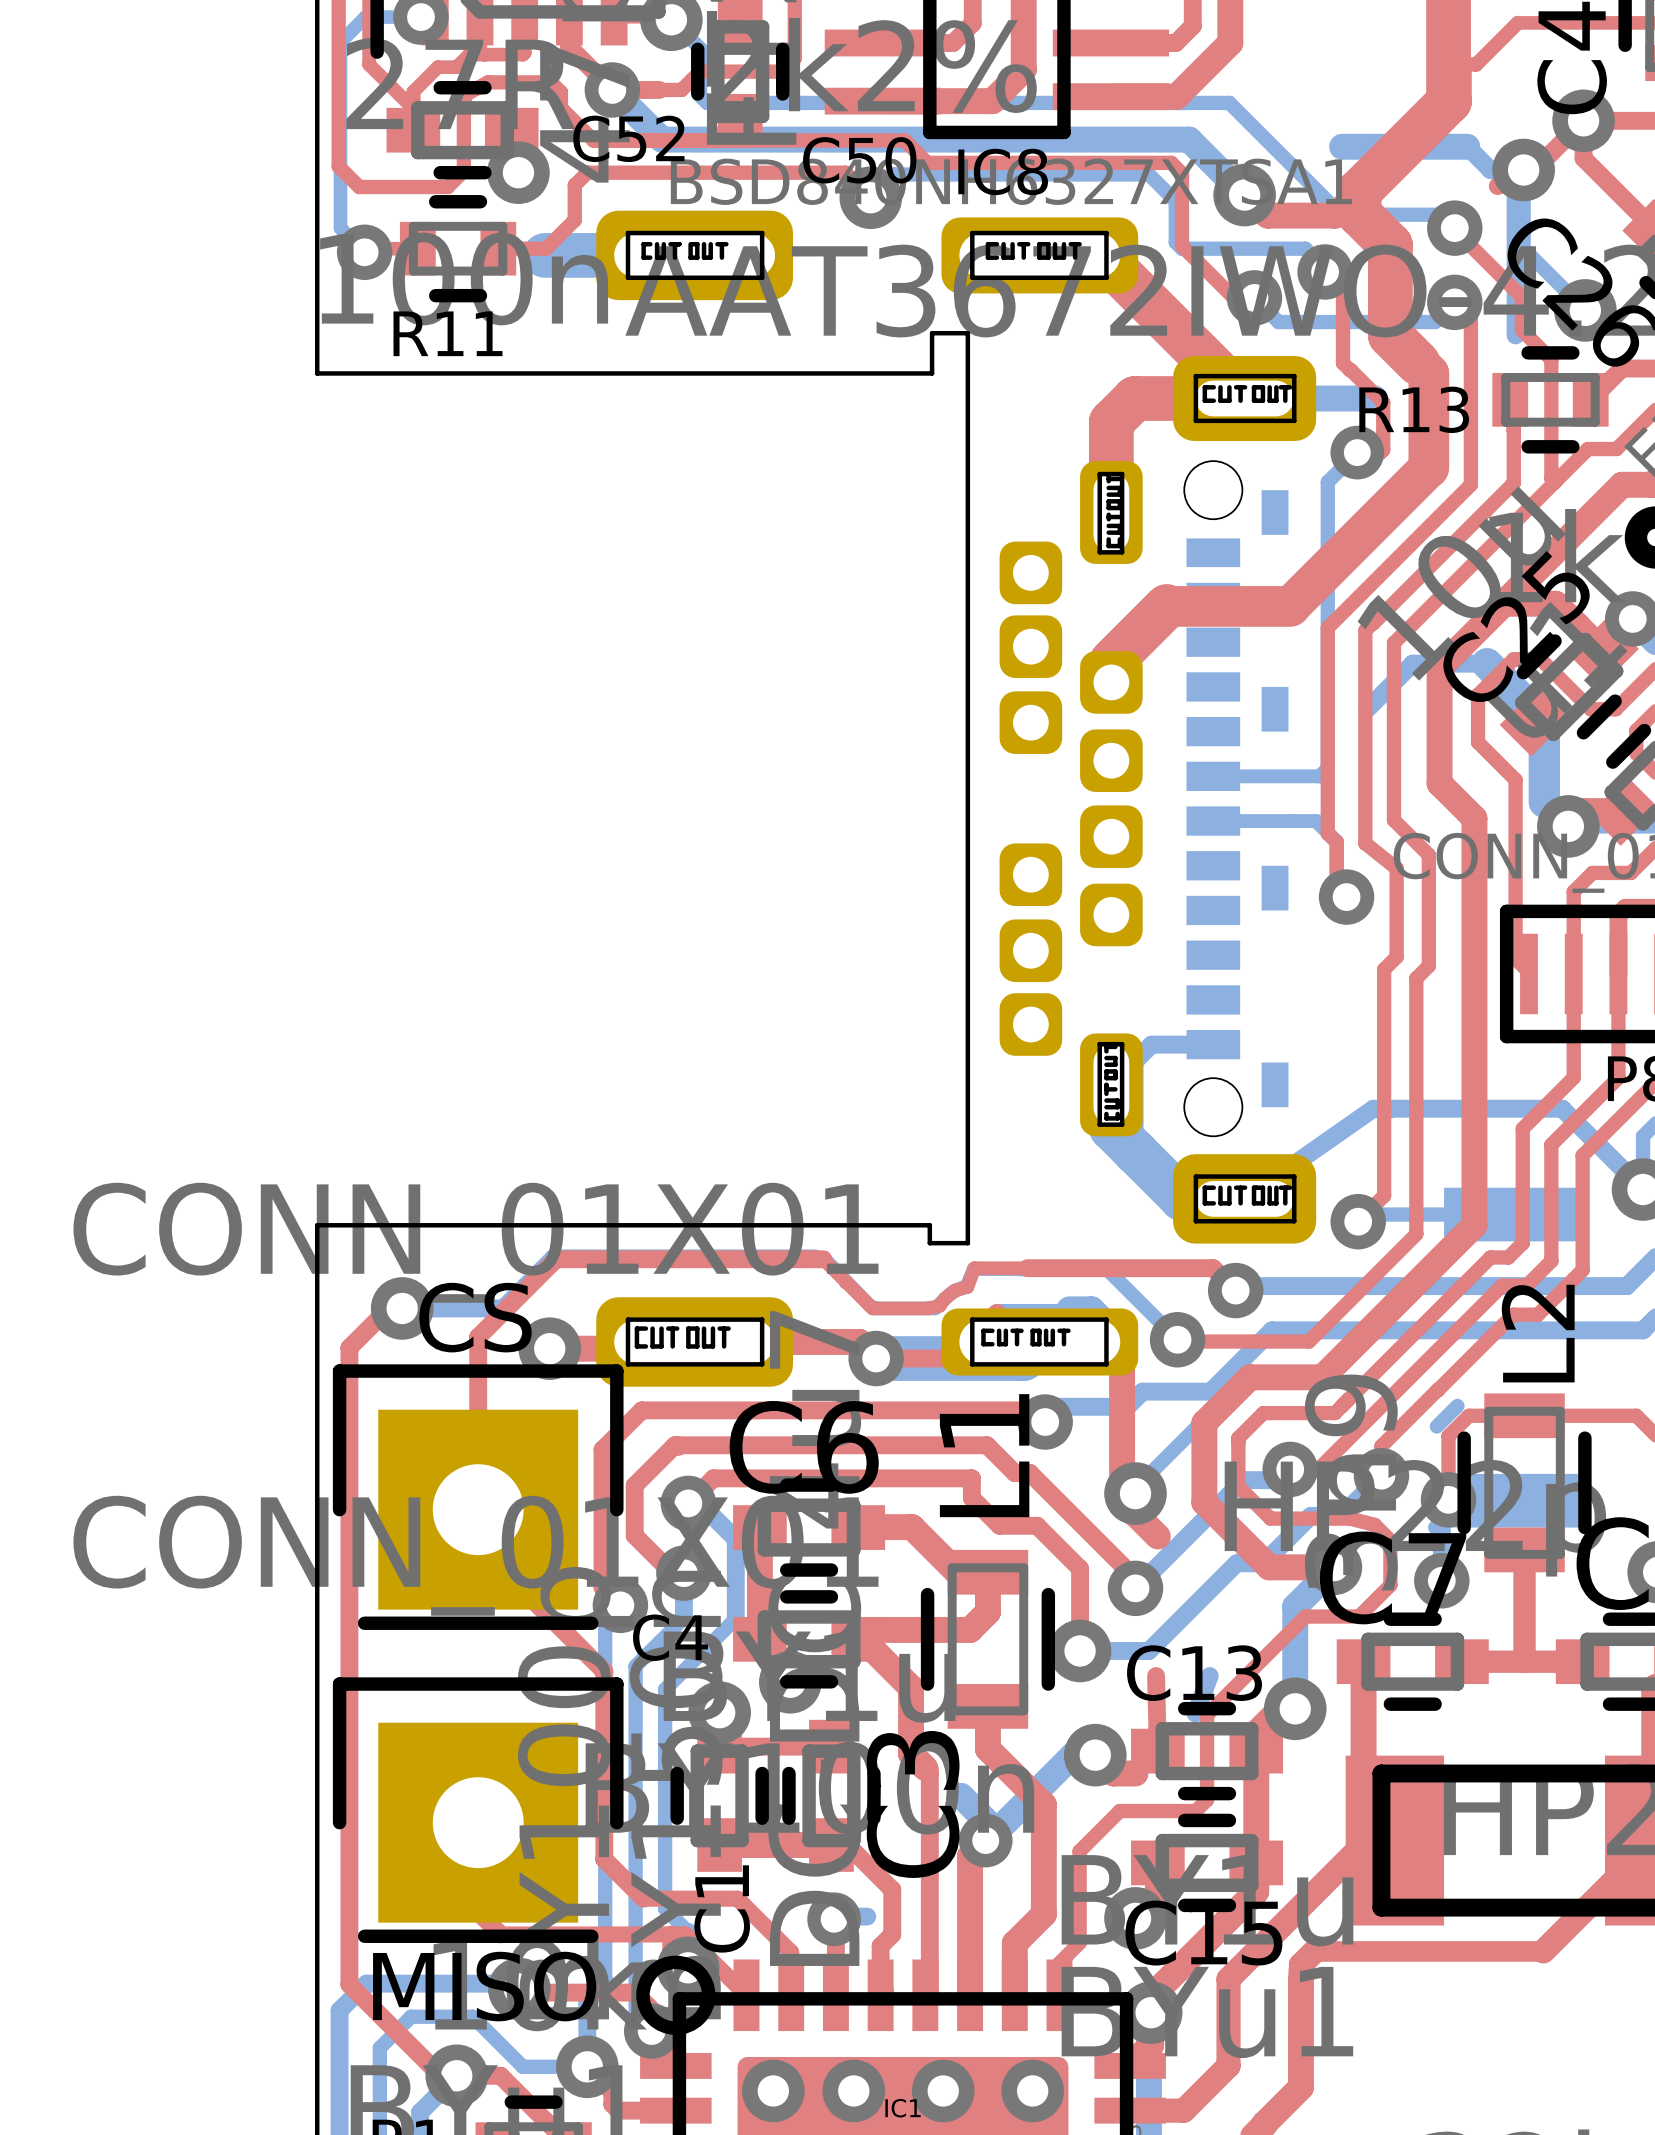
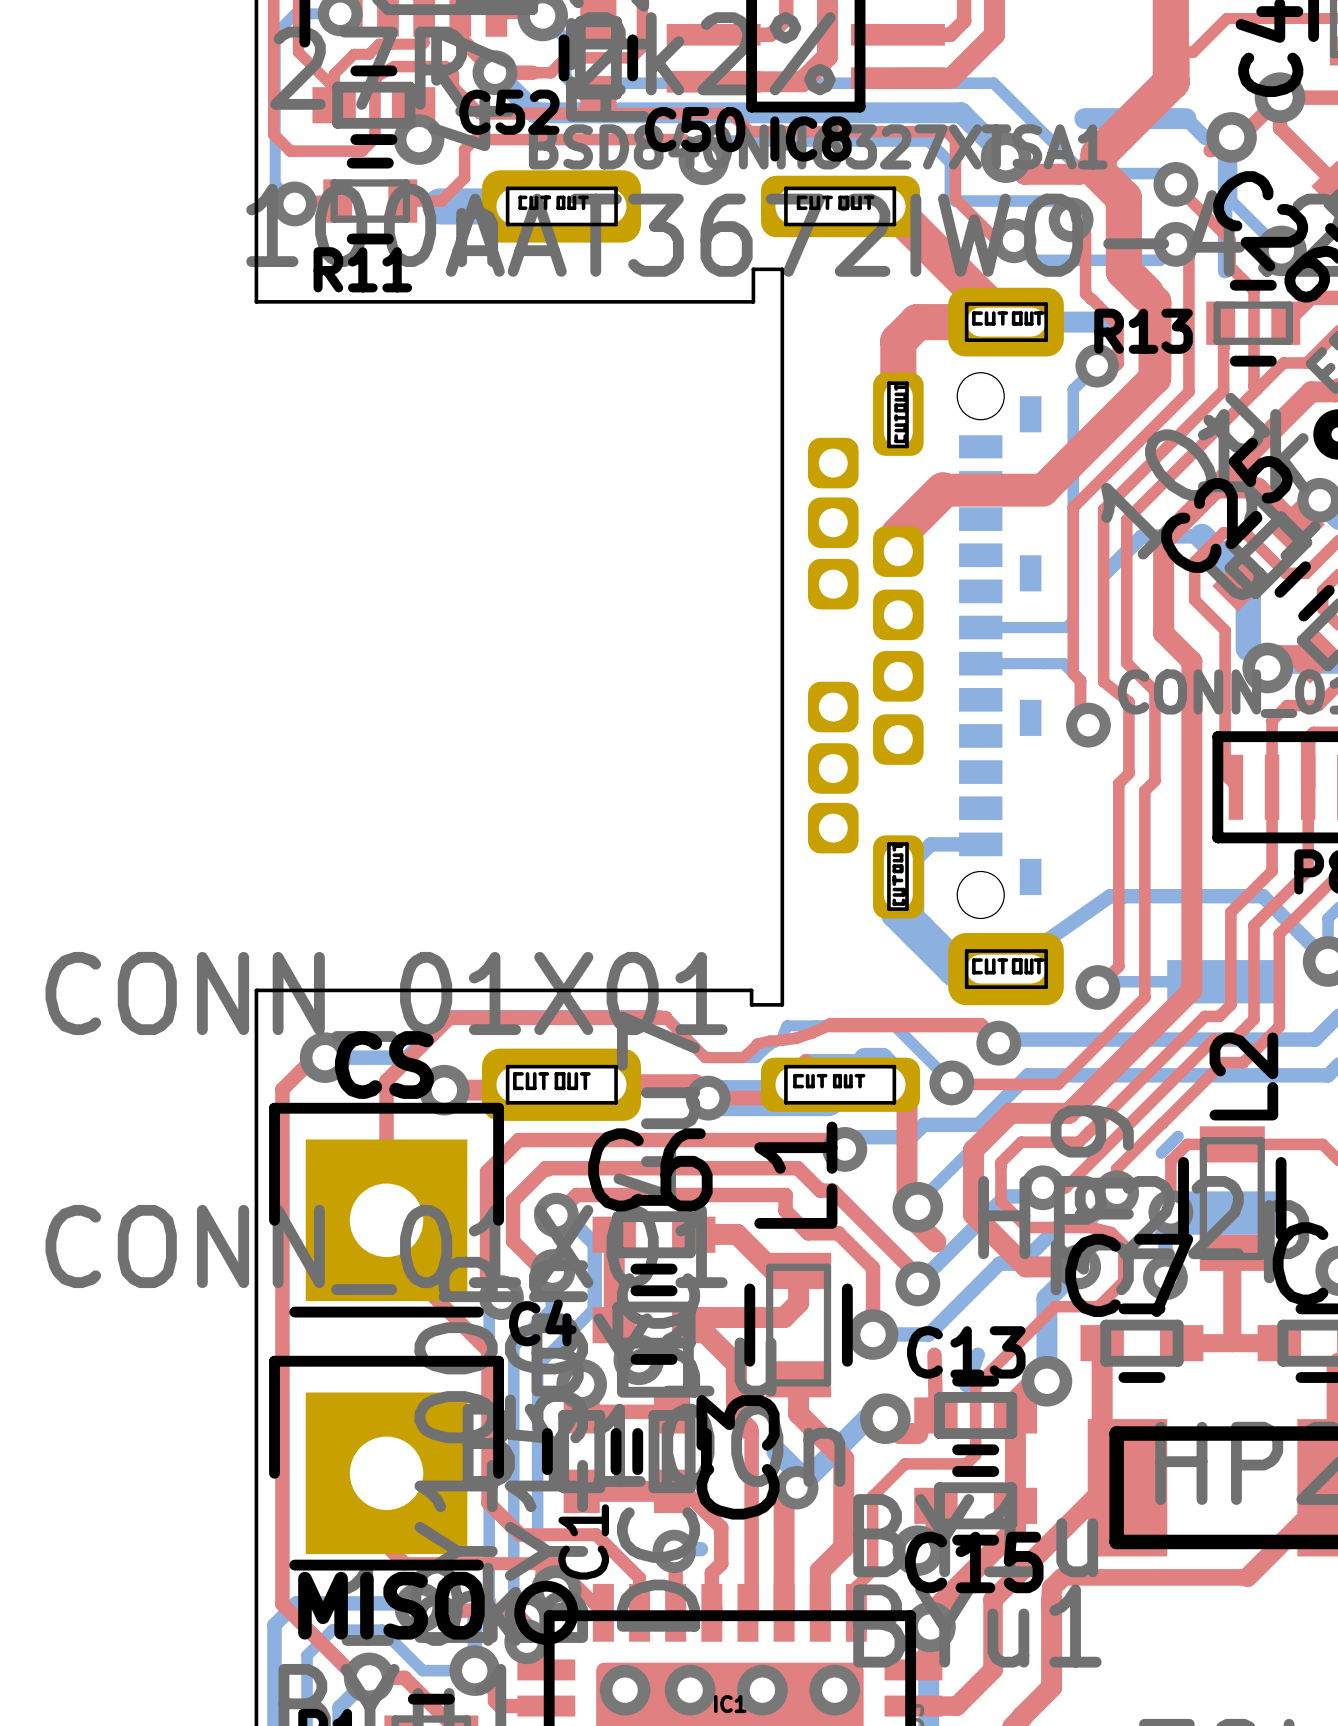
top track: (1027, 1268) (974, 1268) (967, 1286) (954, 1290) (939, 1305) (919, 1308) -> (830, 1025) (796, 1038) (757, 1043) (742, 1057)

